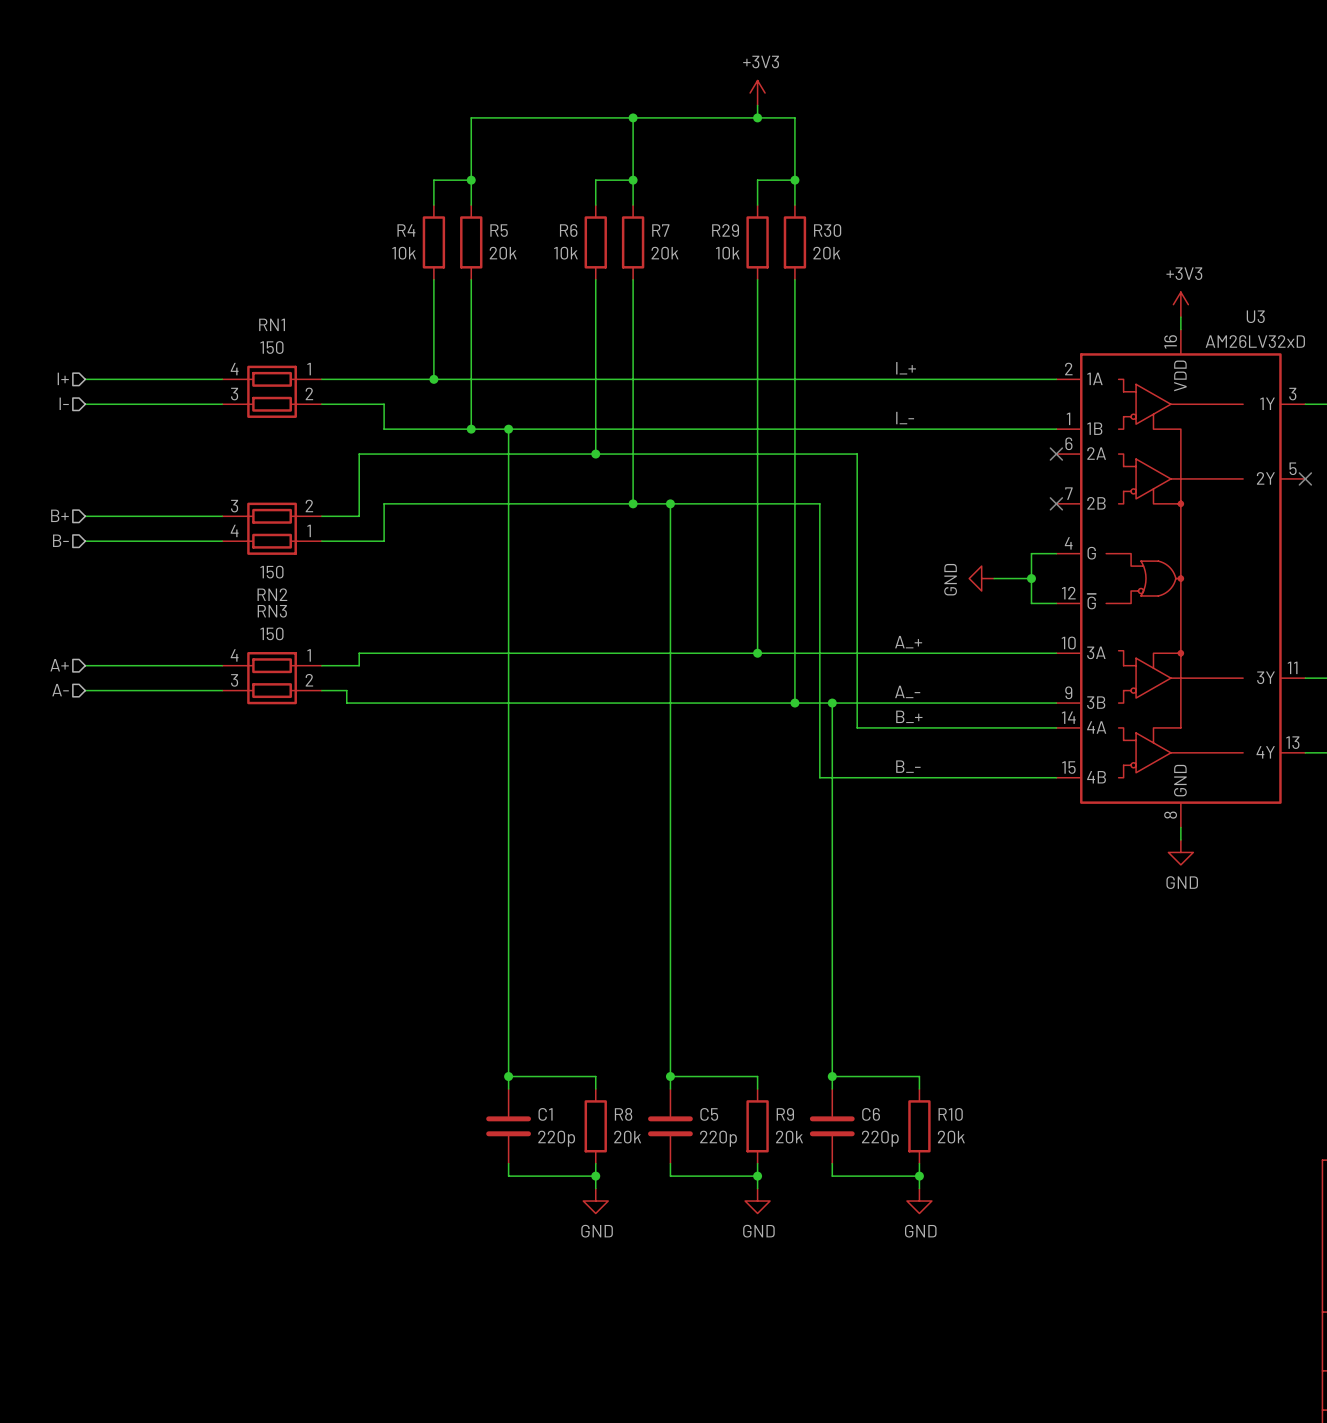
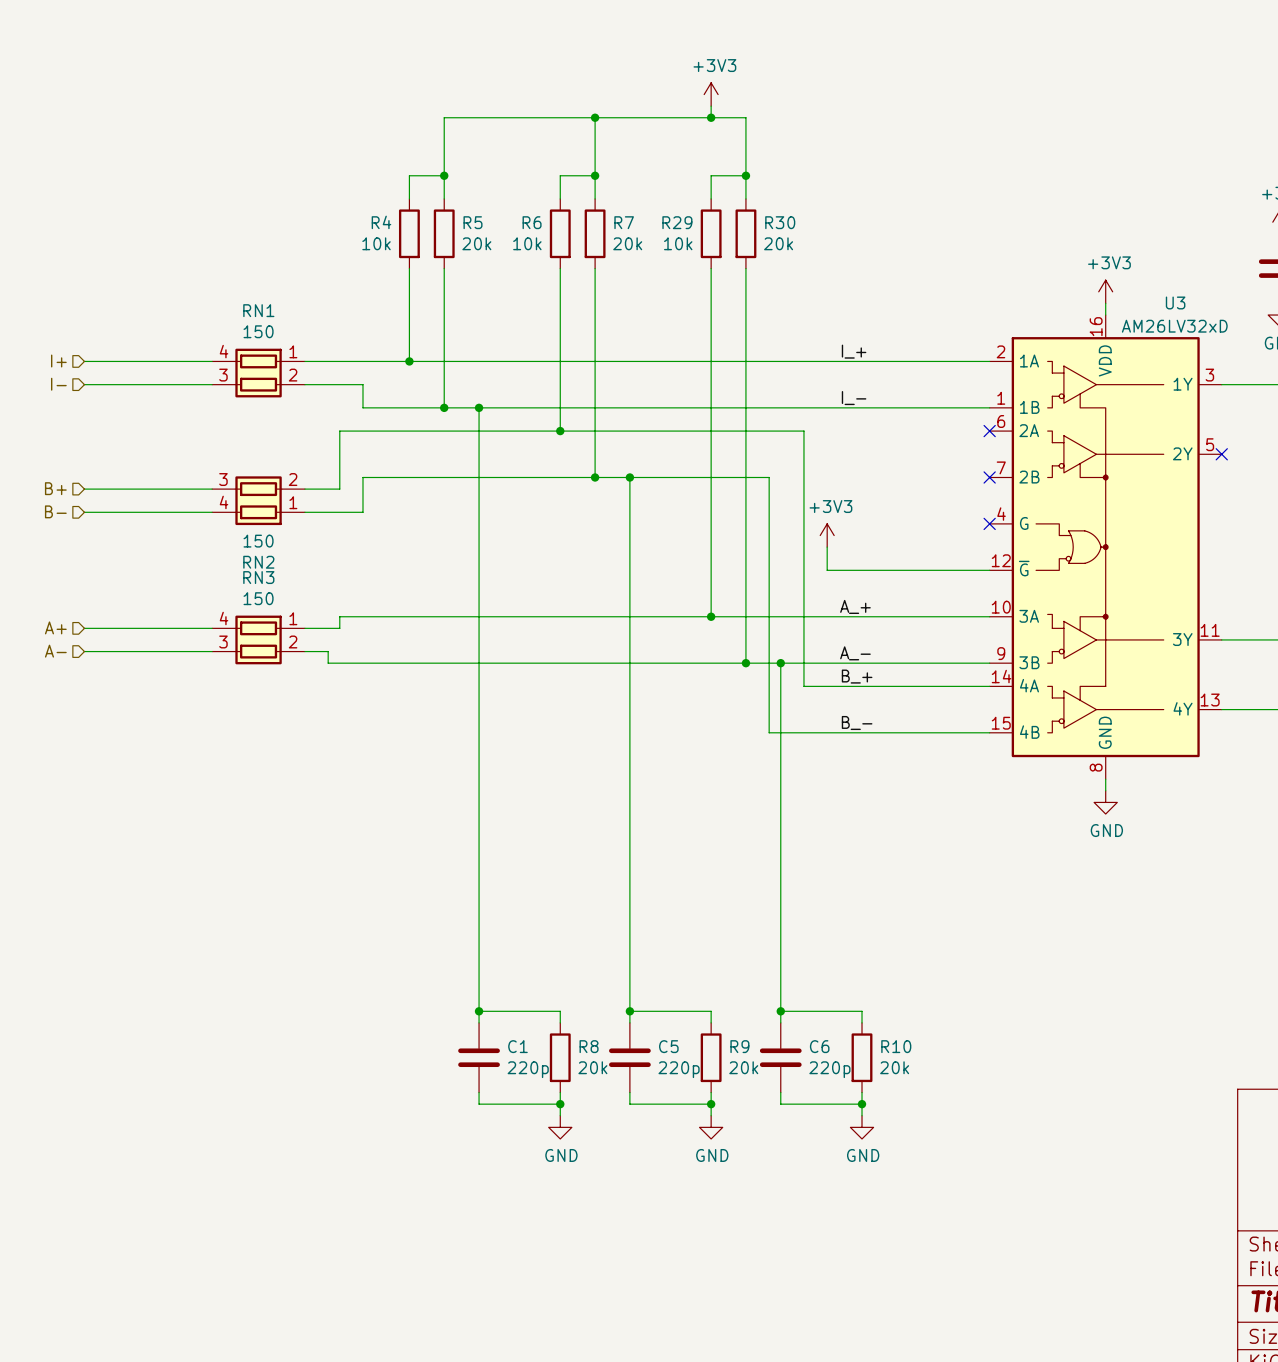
wire: (1056, 553) (1031, 553) (1031, 603) -> (827, 547) (827, 570) (966, 570)
no-connect mark: none -> (989, 523)
power symbol: none -> +3V3 (827, 535)
power symbol: GND (981, 578) -> none
wire: (994, 578) (1031, 578) -> none
junction: (1031, 578) -> none

